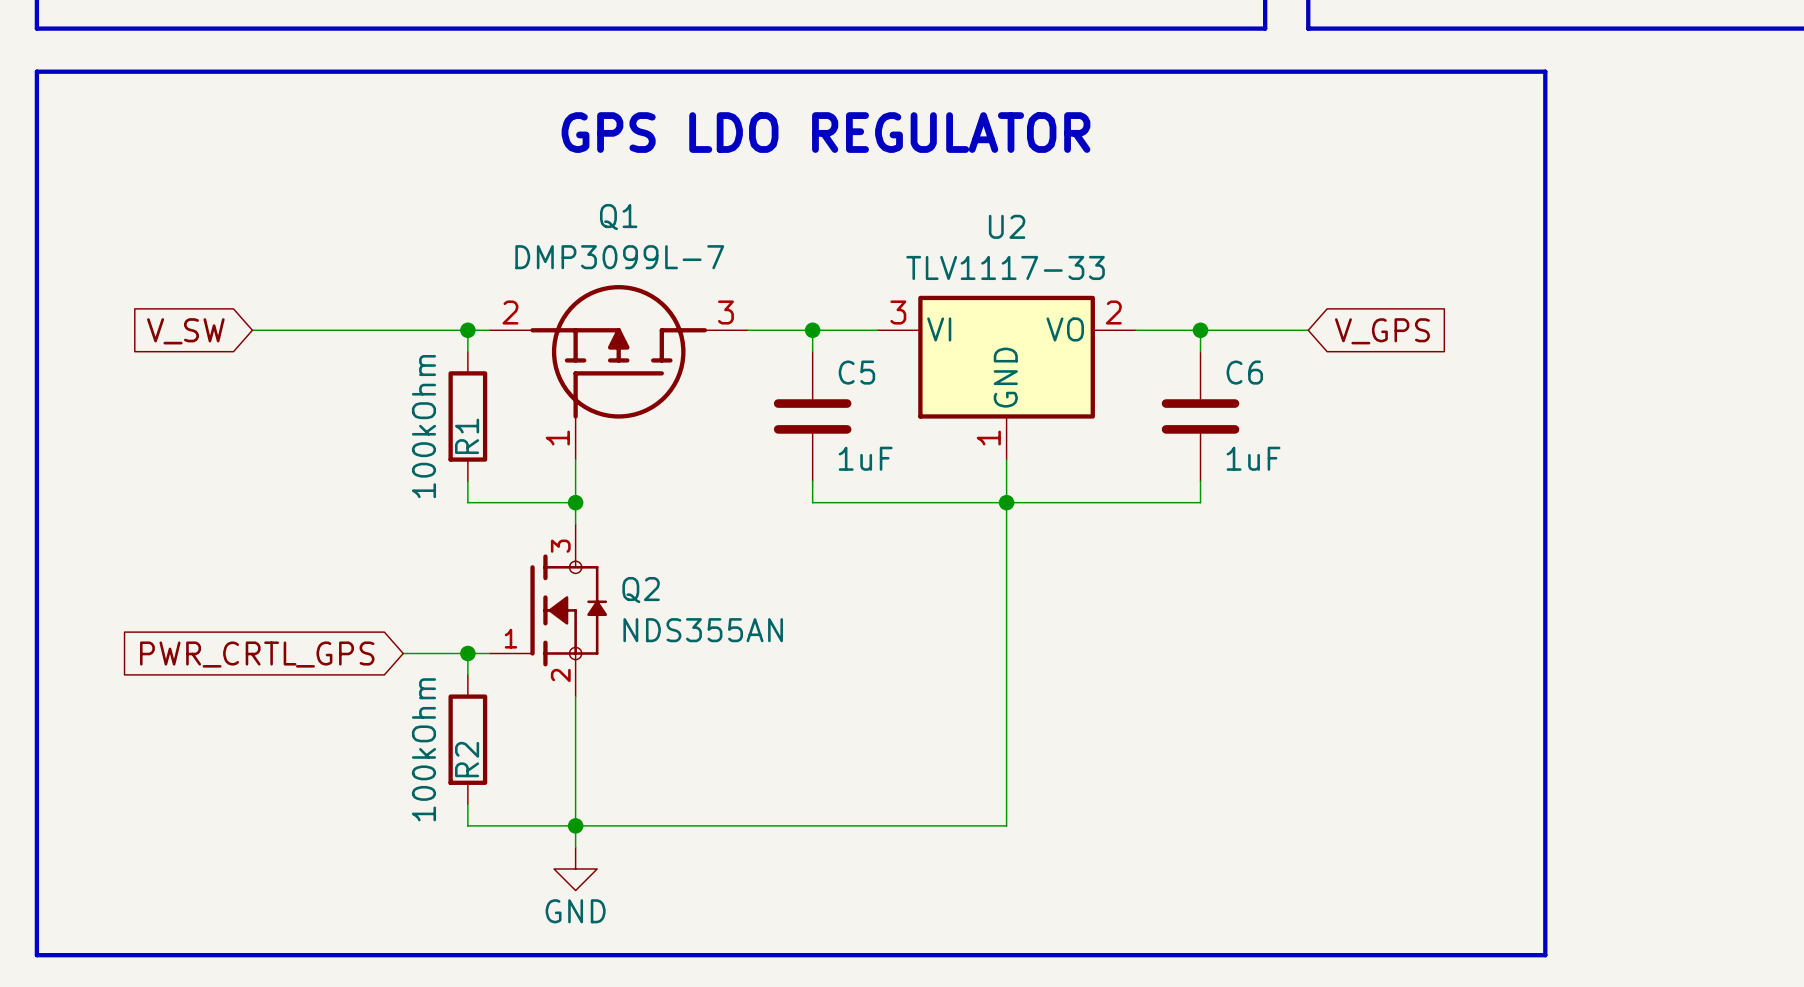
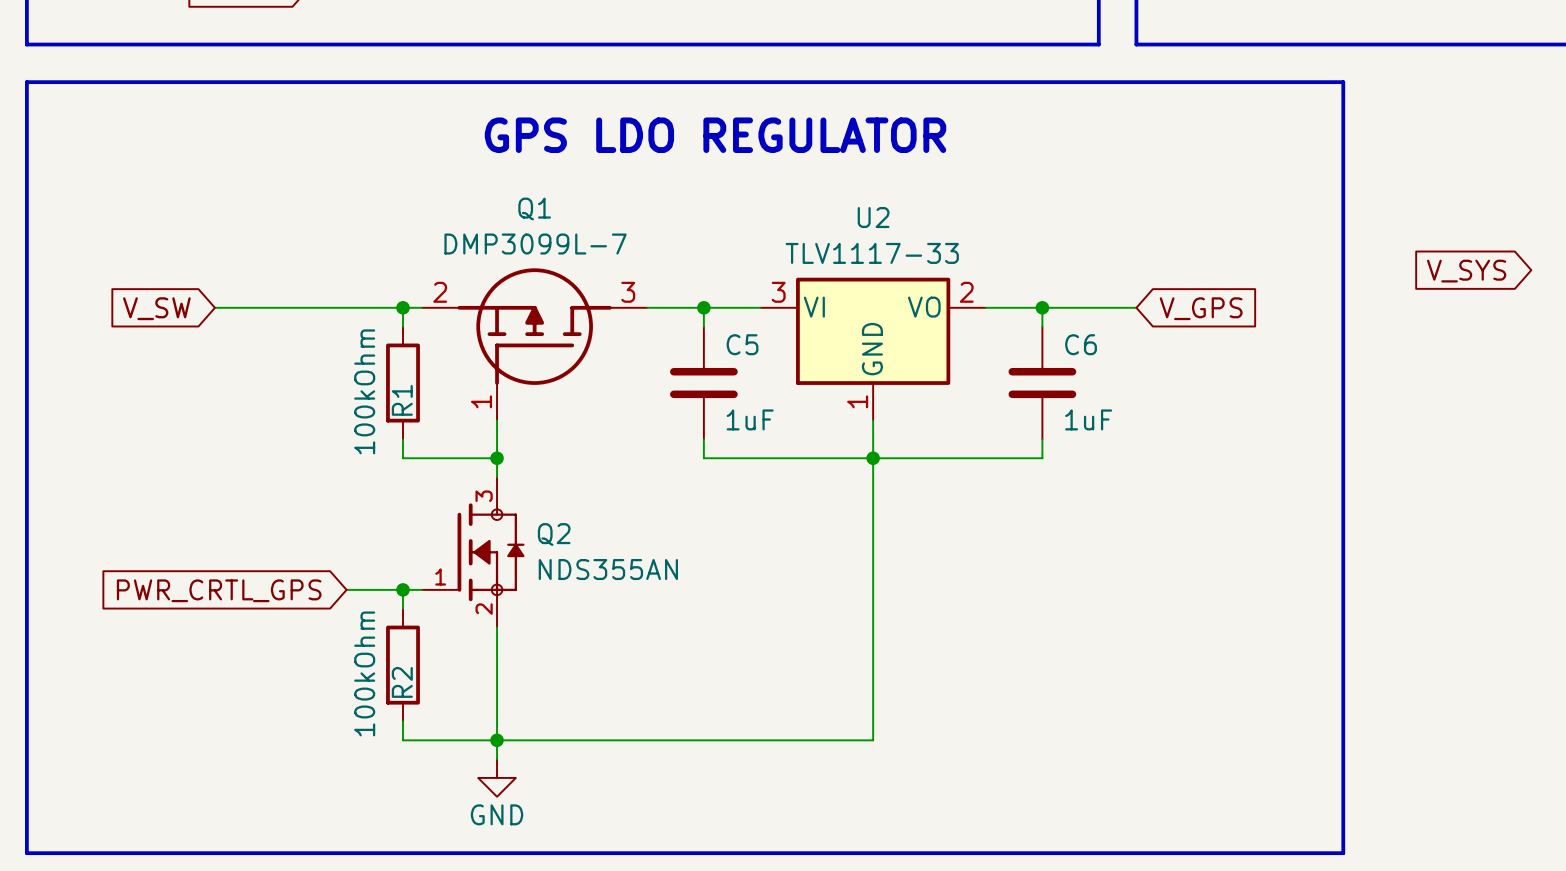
global label: none -> V_SYS (1466, 271)

